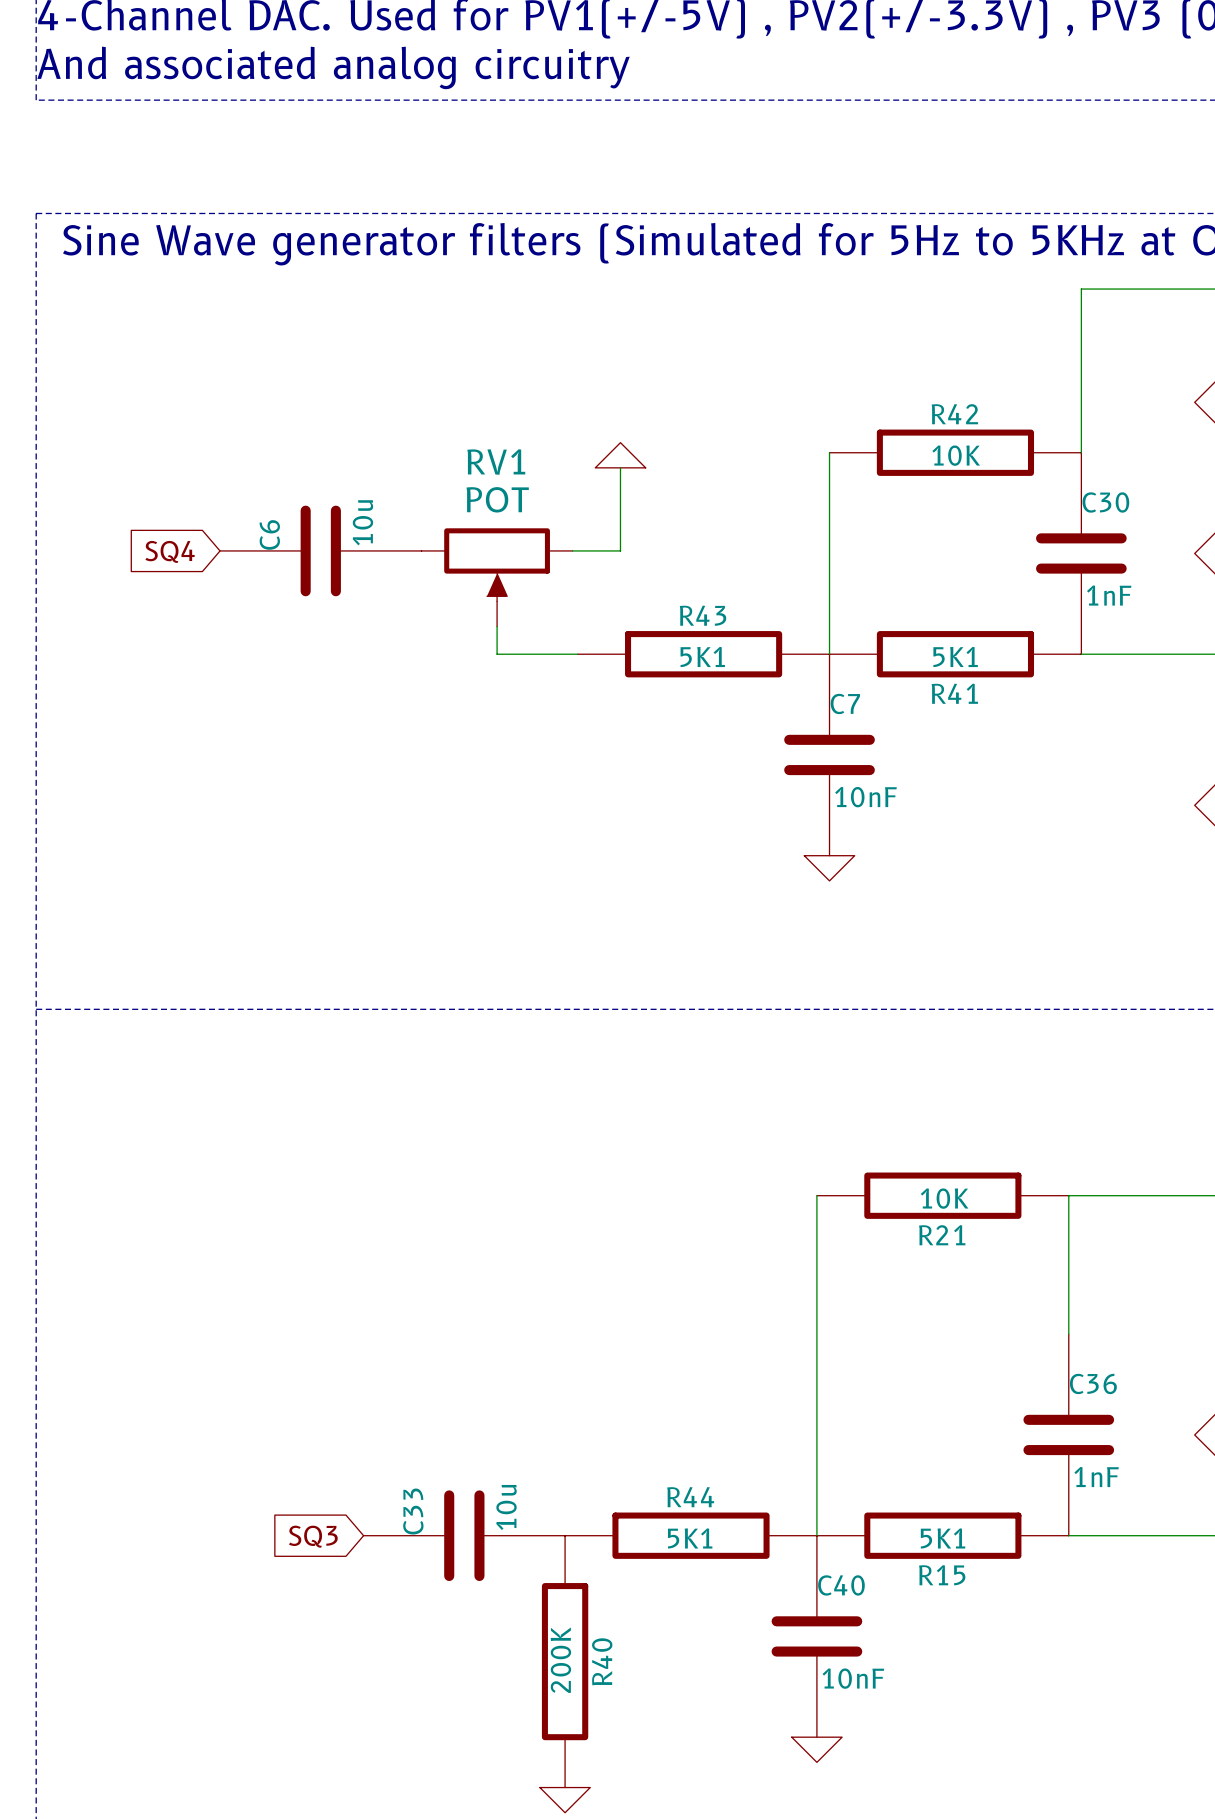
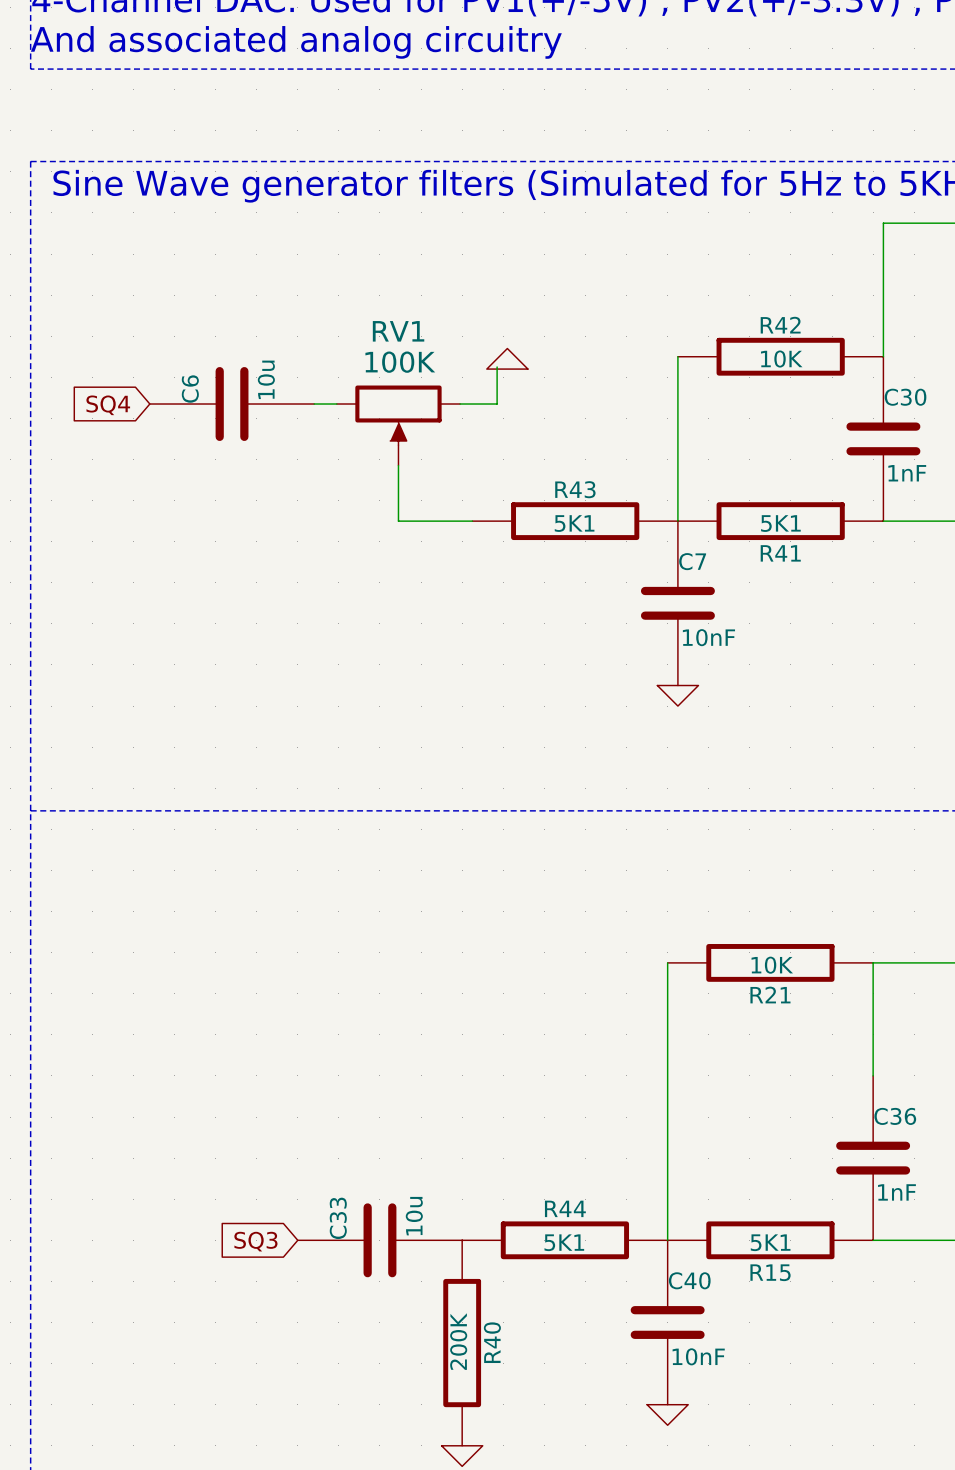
wire: none -> (497, 367) (497, 404) (460, 404)
wire: (620, 467) (620, 550) (572, 550) -> none
RV1 value: POT (497, 499) -> 100K (400, 362)
wire: none -> (314, 404) (336, 404)
C6 position: (320, 550) -> (232, 404)
global label position: SQ4 (170, 551) -> SQ4 (108, 405)
RV1 position: (497, 577) -> (398, 425)
wire: (497, 626) (497, 654) -> (398, 465) (398, 521) (406, 521)

